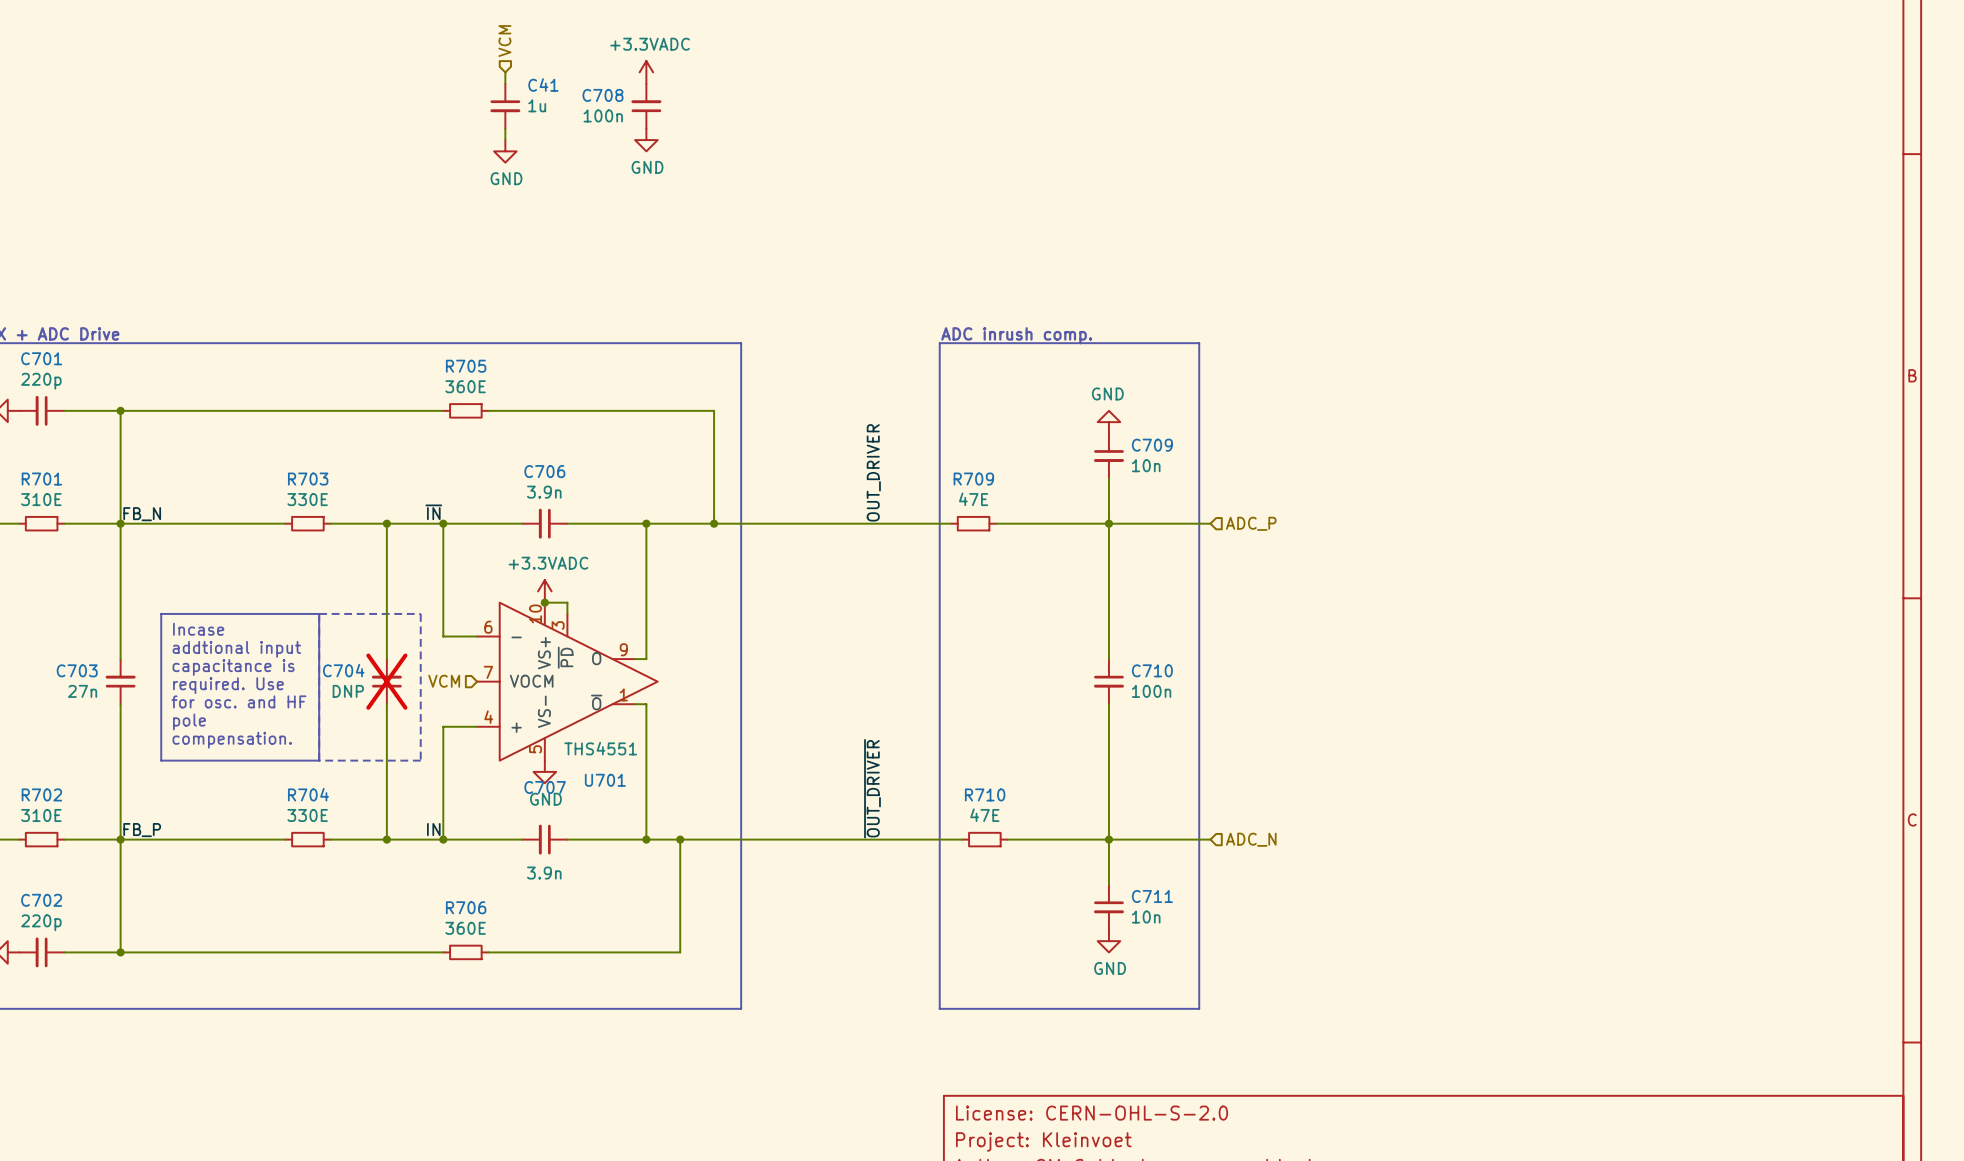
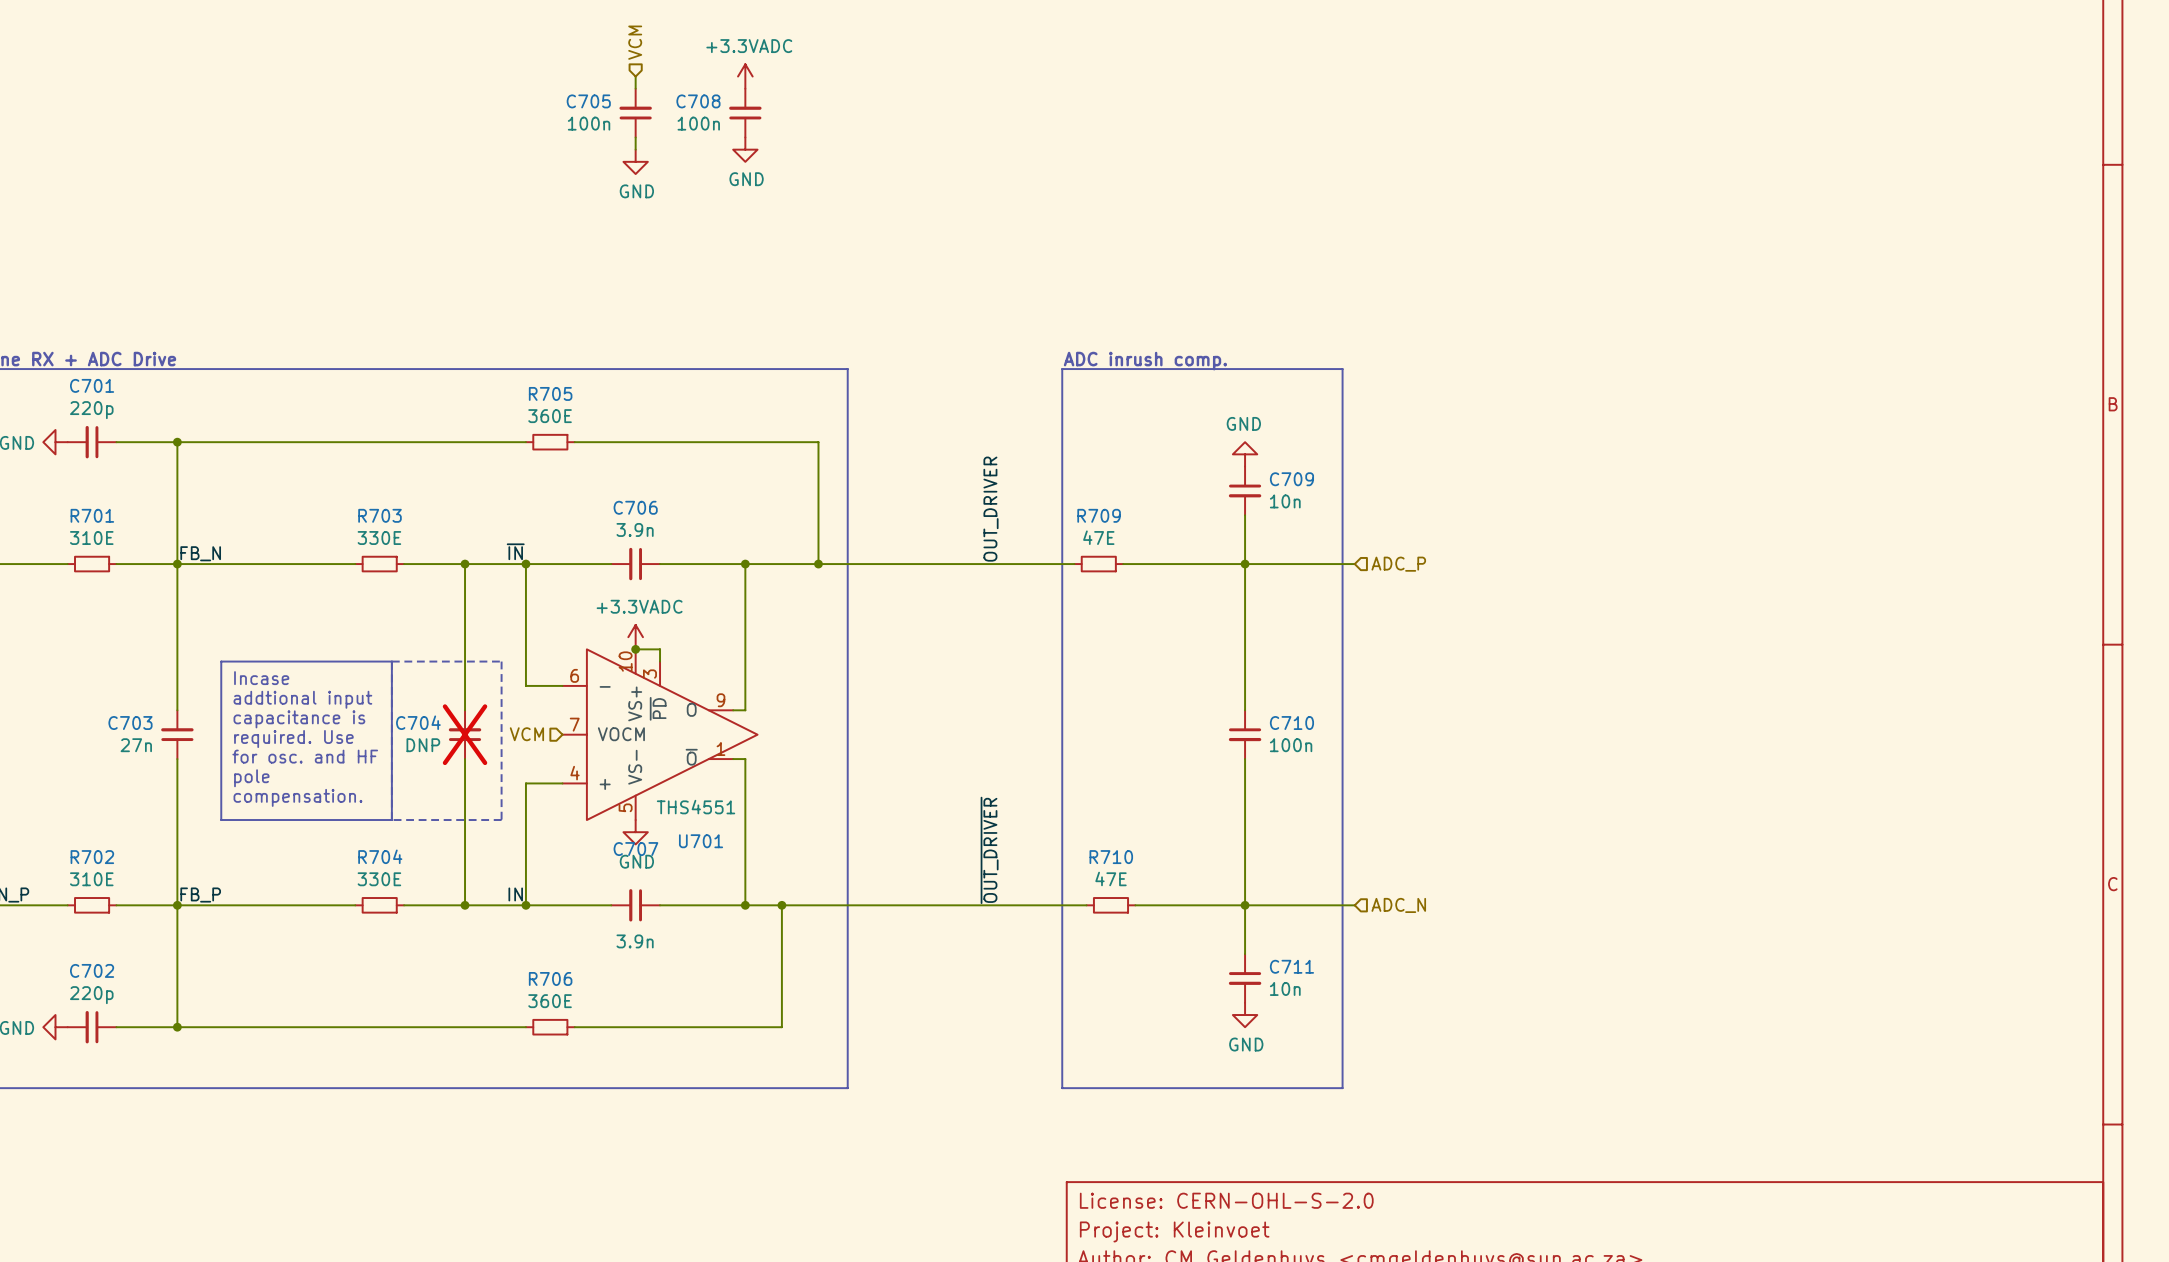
hierarchical label position: VCM (504, 41) -> VCM (635, 42)
wire: (505, 72) (505, 83) -> (635, 76) (635, 88)
C41: 1u (505, 106) -> none
C705: none -> 100n (635, 113)
wire: (505, 128) (505, 140) -> (635, 137) (635, 149)
power symbol position: GND (505, 151) -> GND (635, 161)

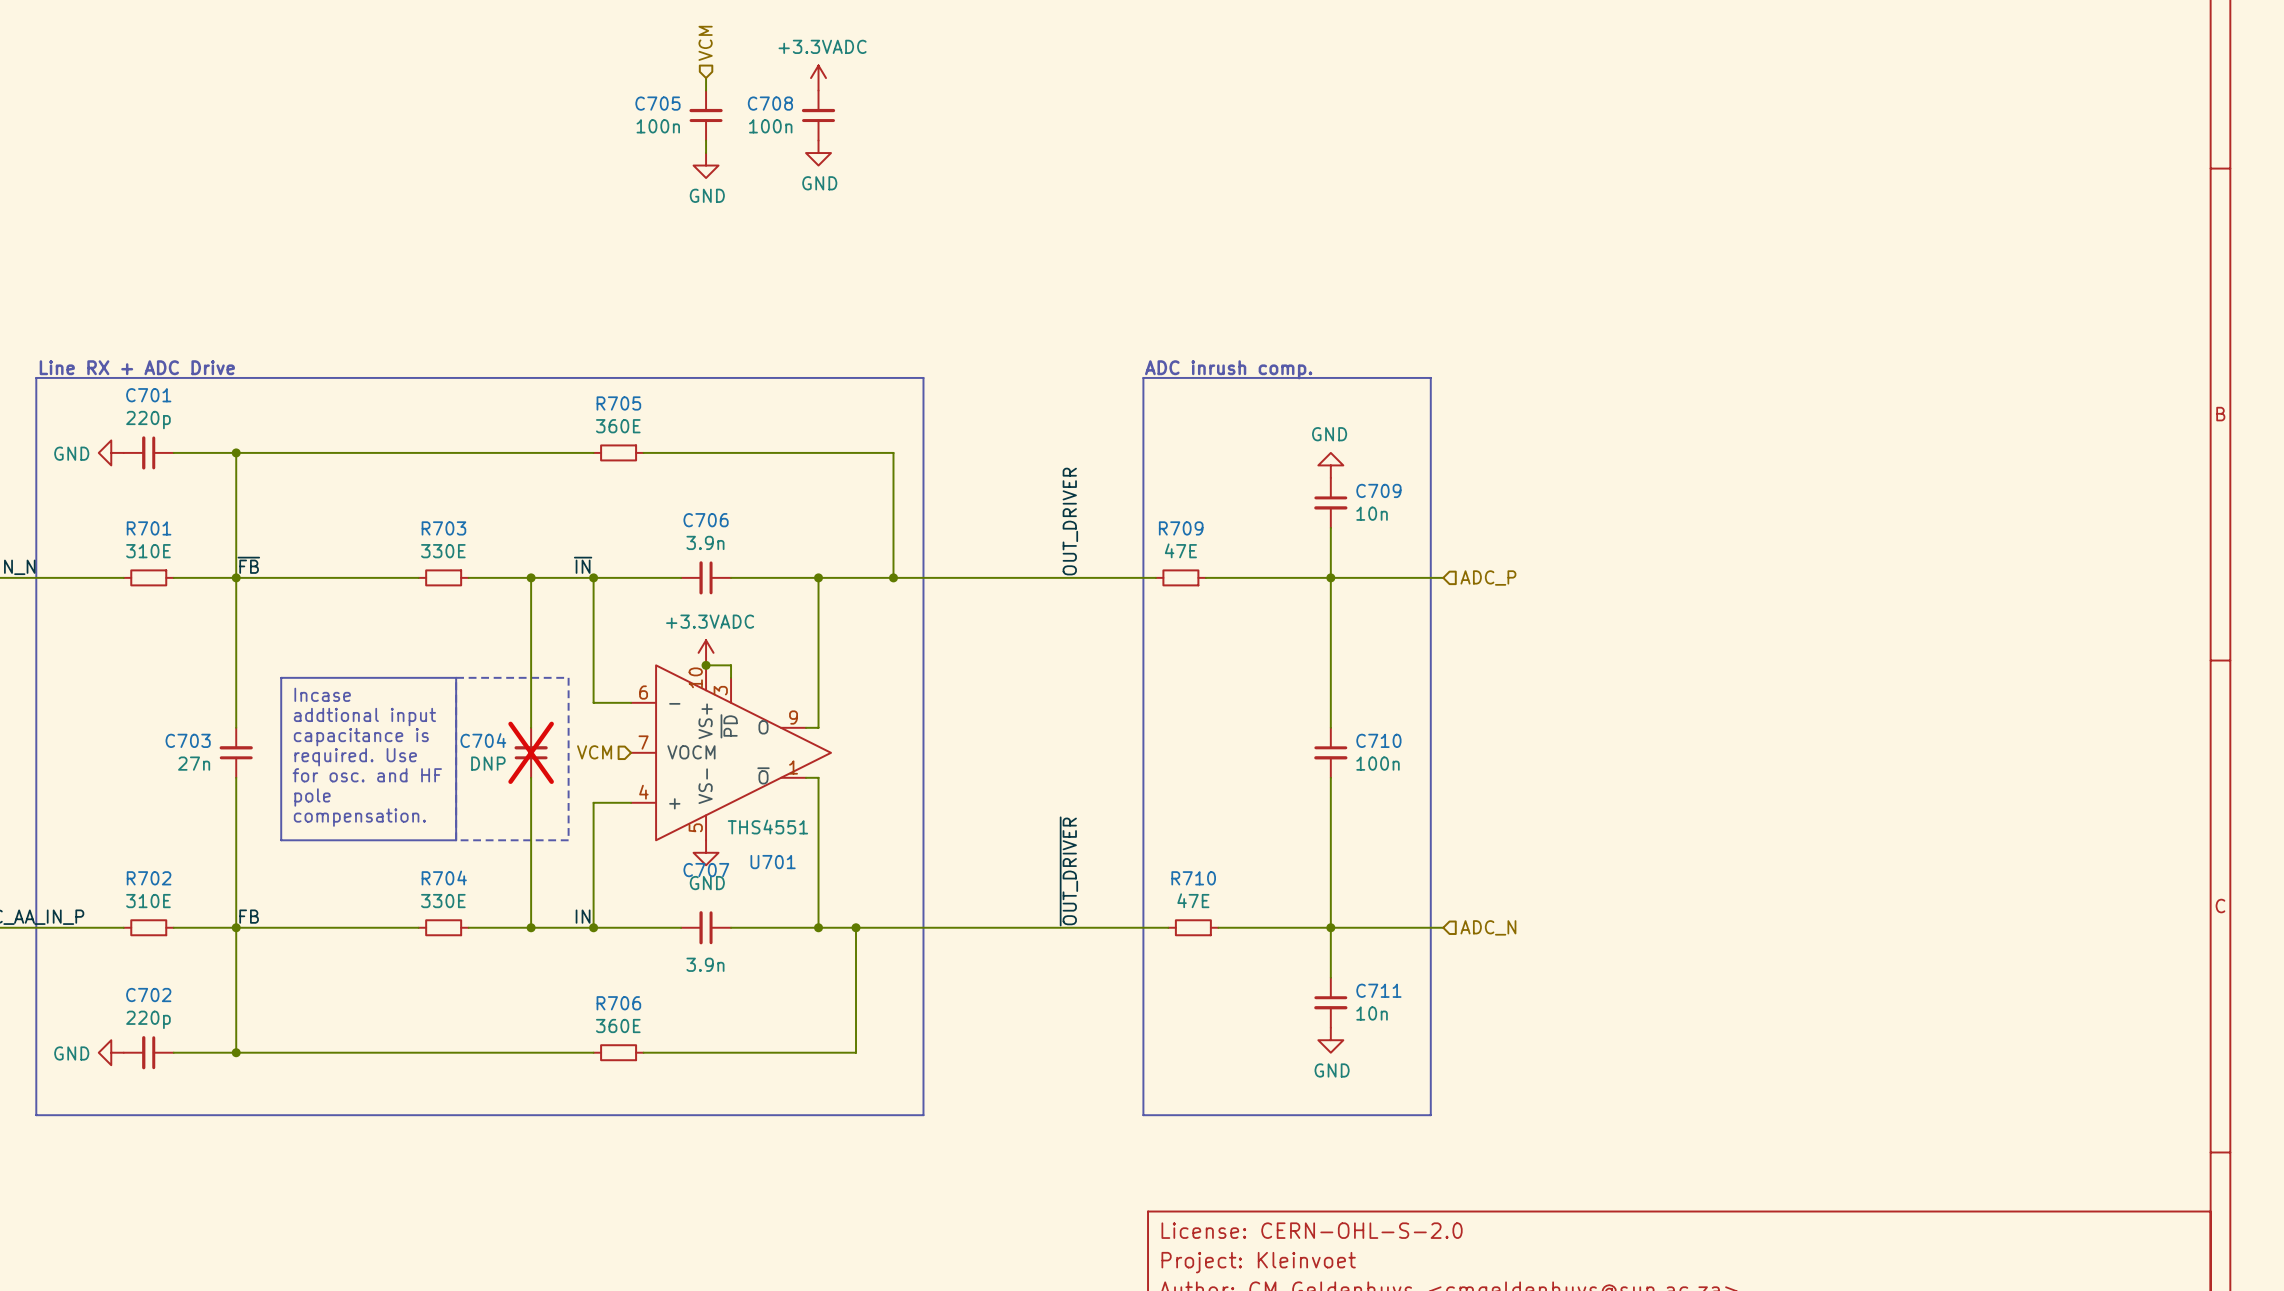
label: FB_N (200, 553) -> ~{FB} (248, 565)
label: FB_P (200, 895) -> FB (249, 916)

